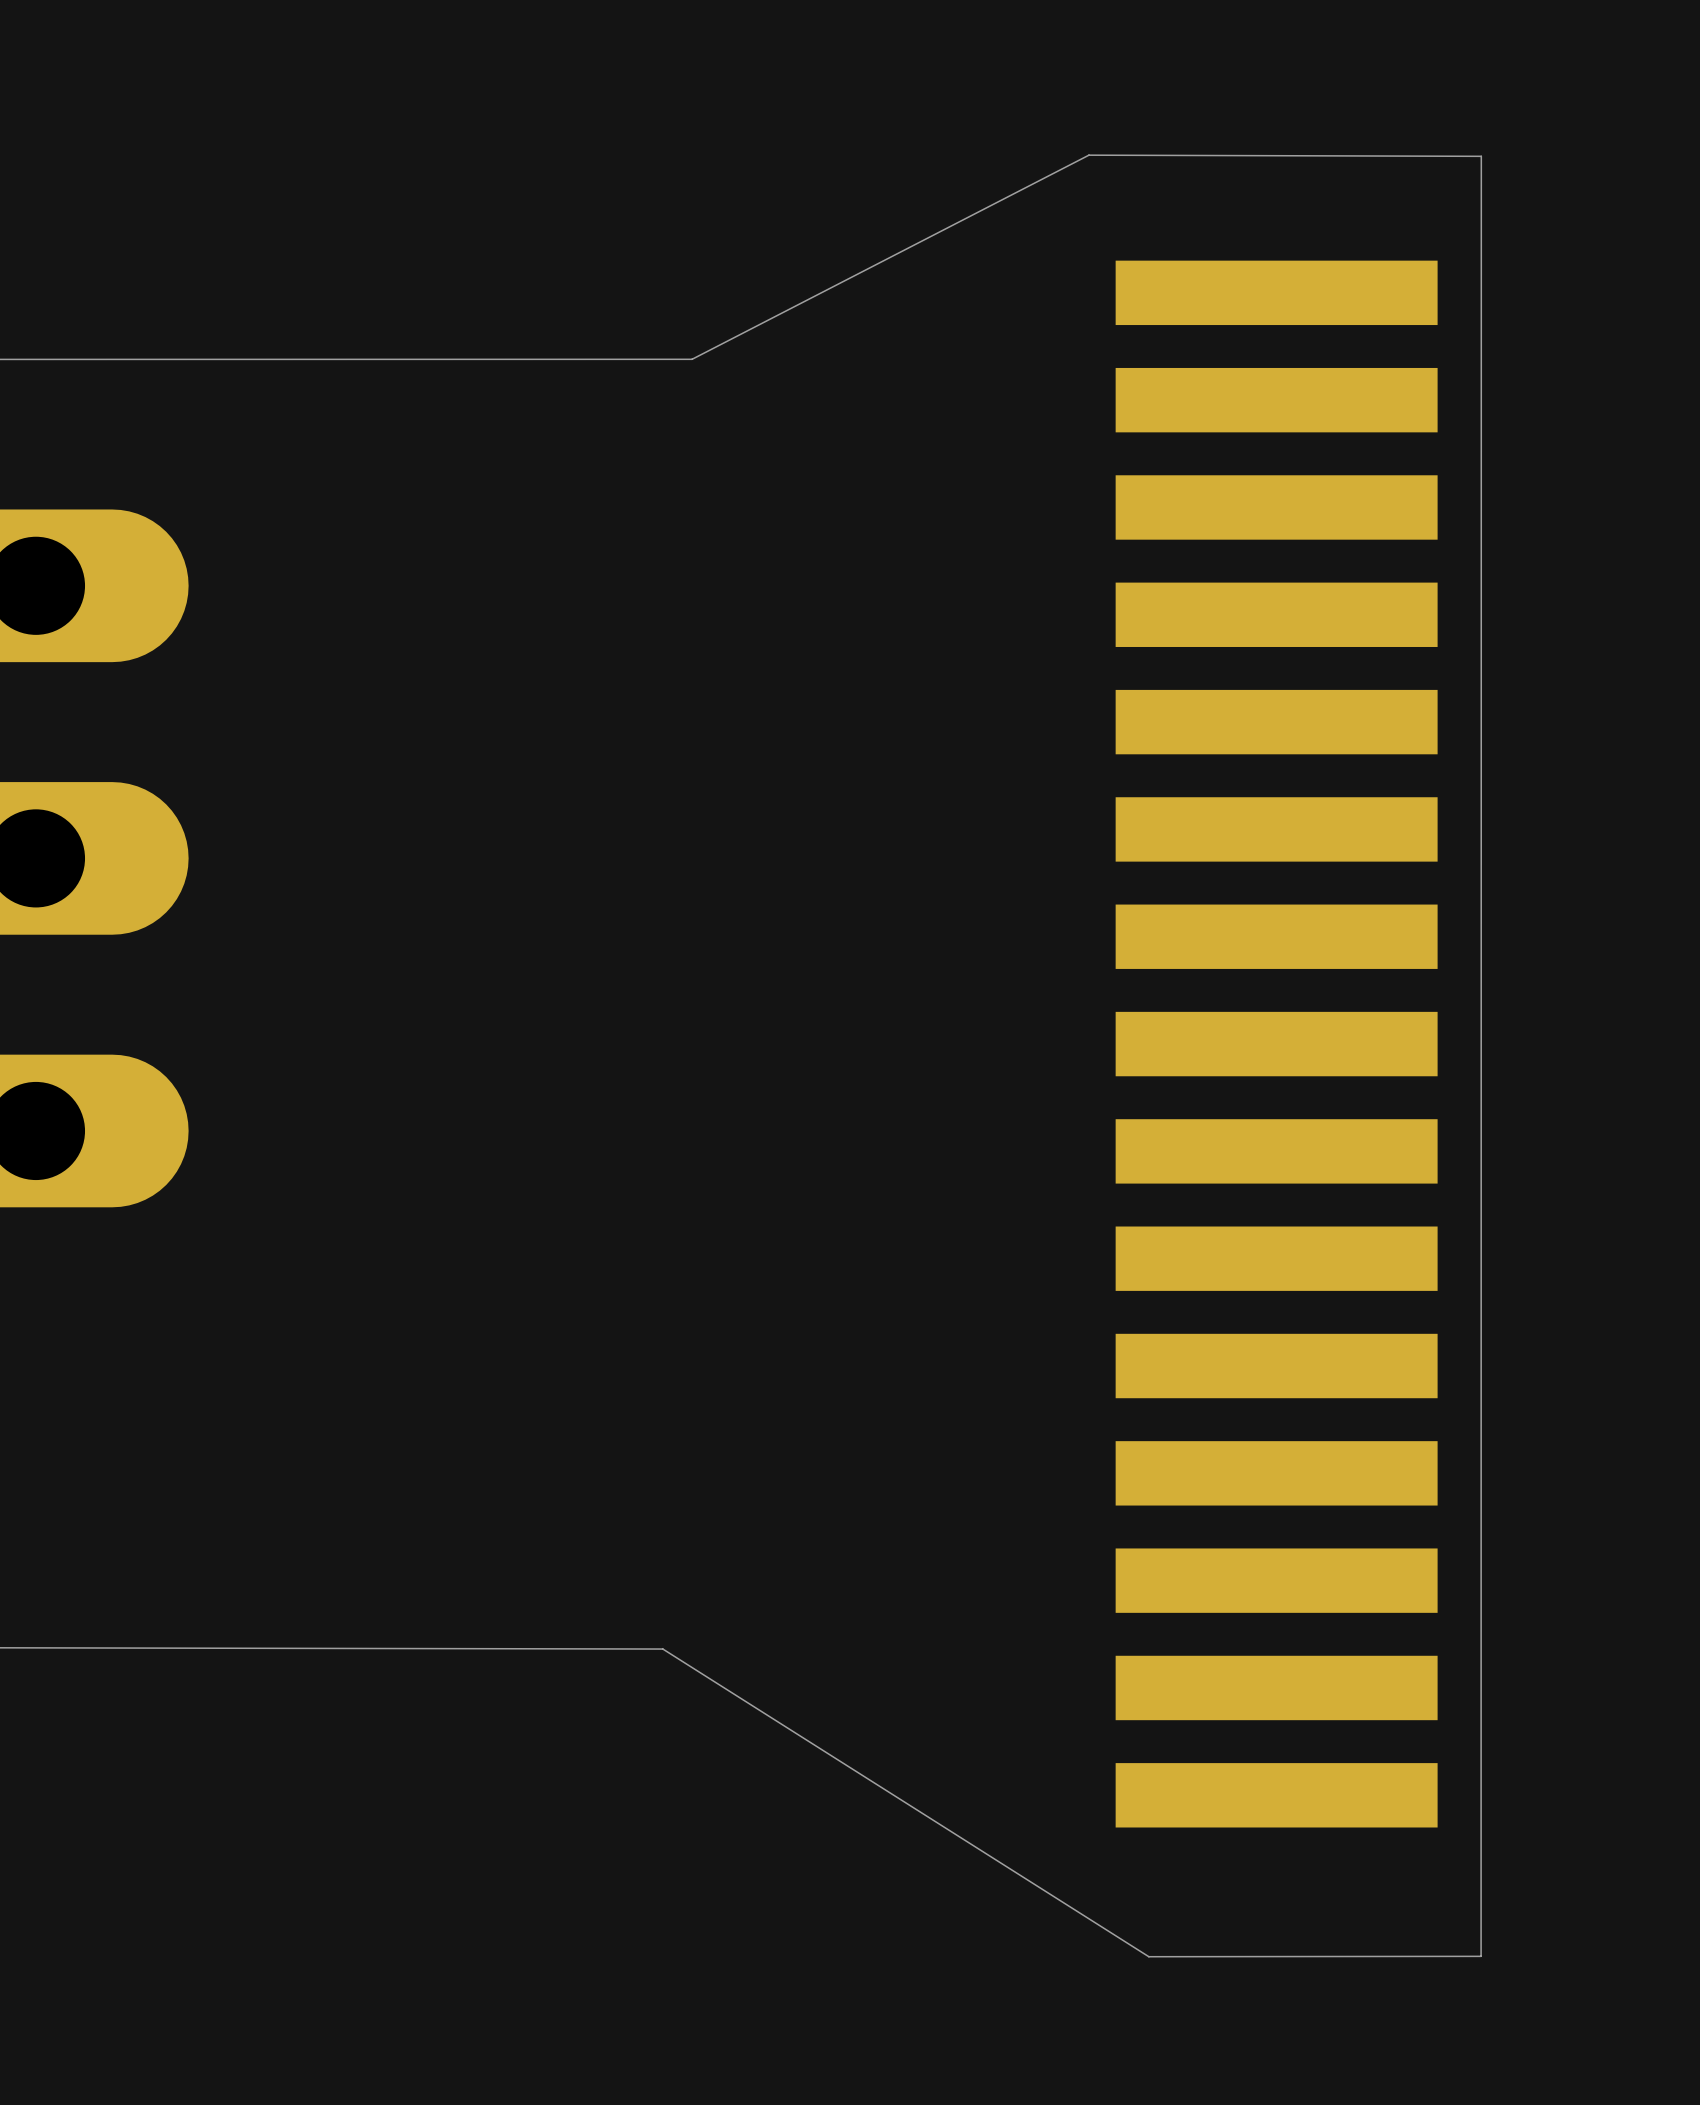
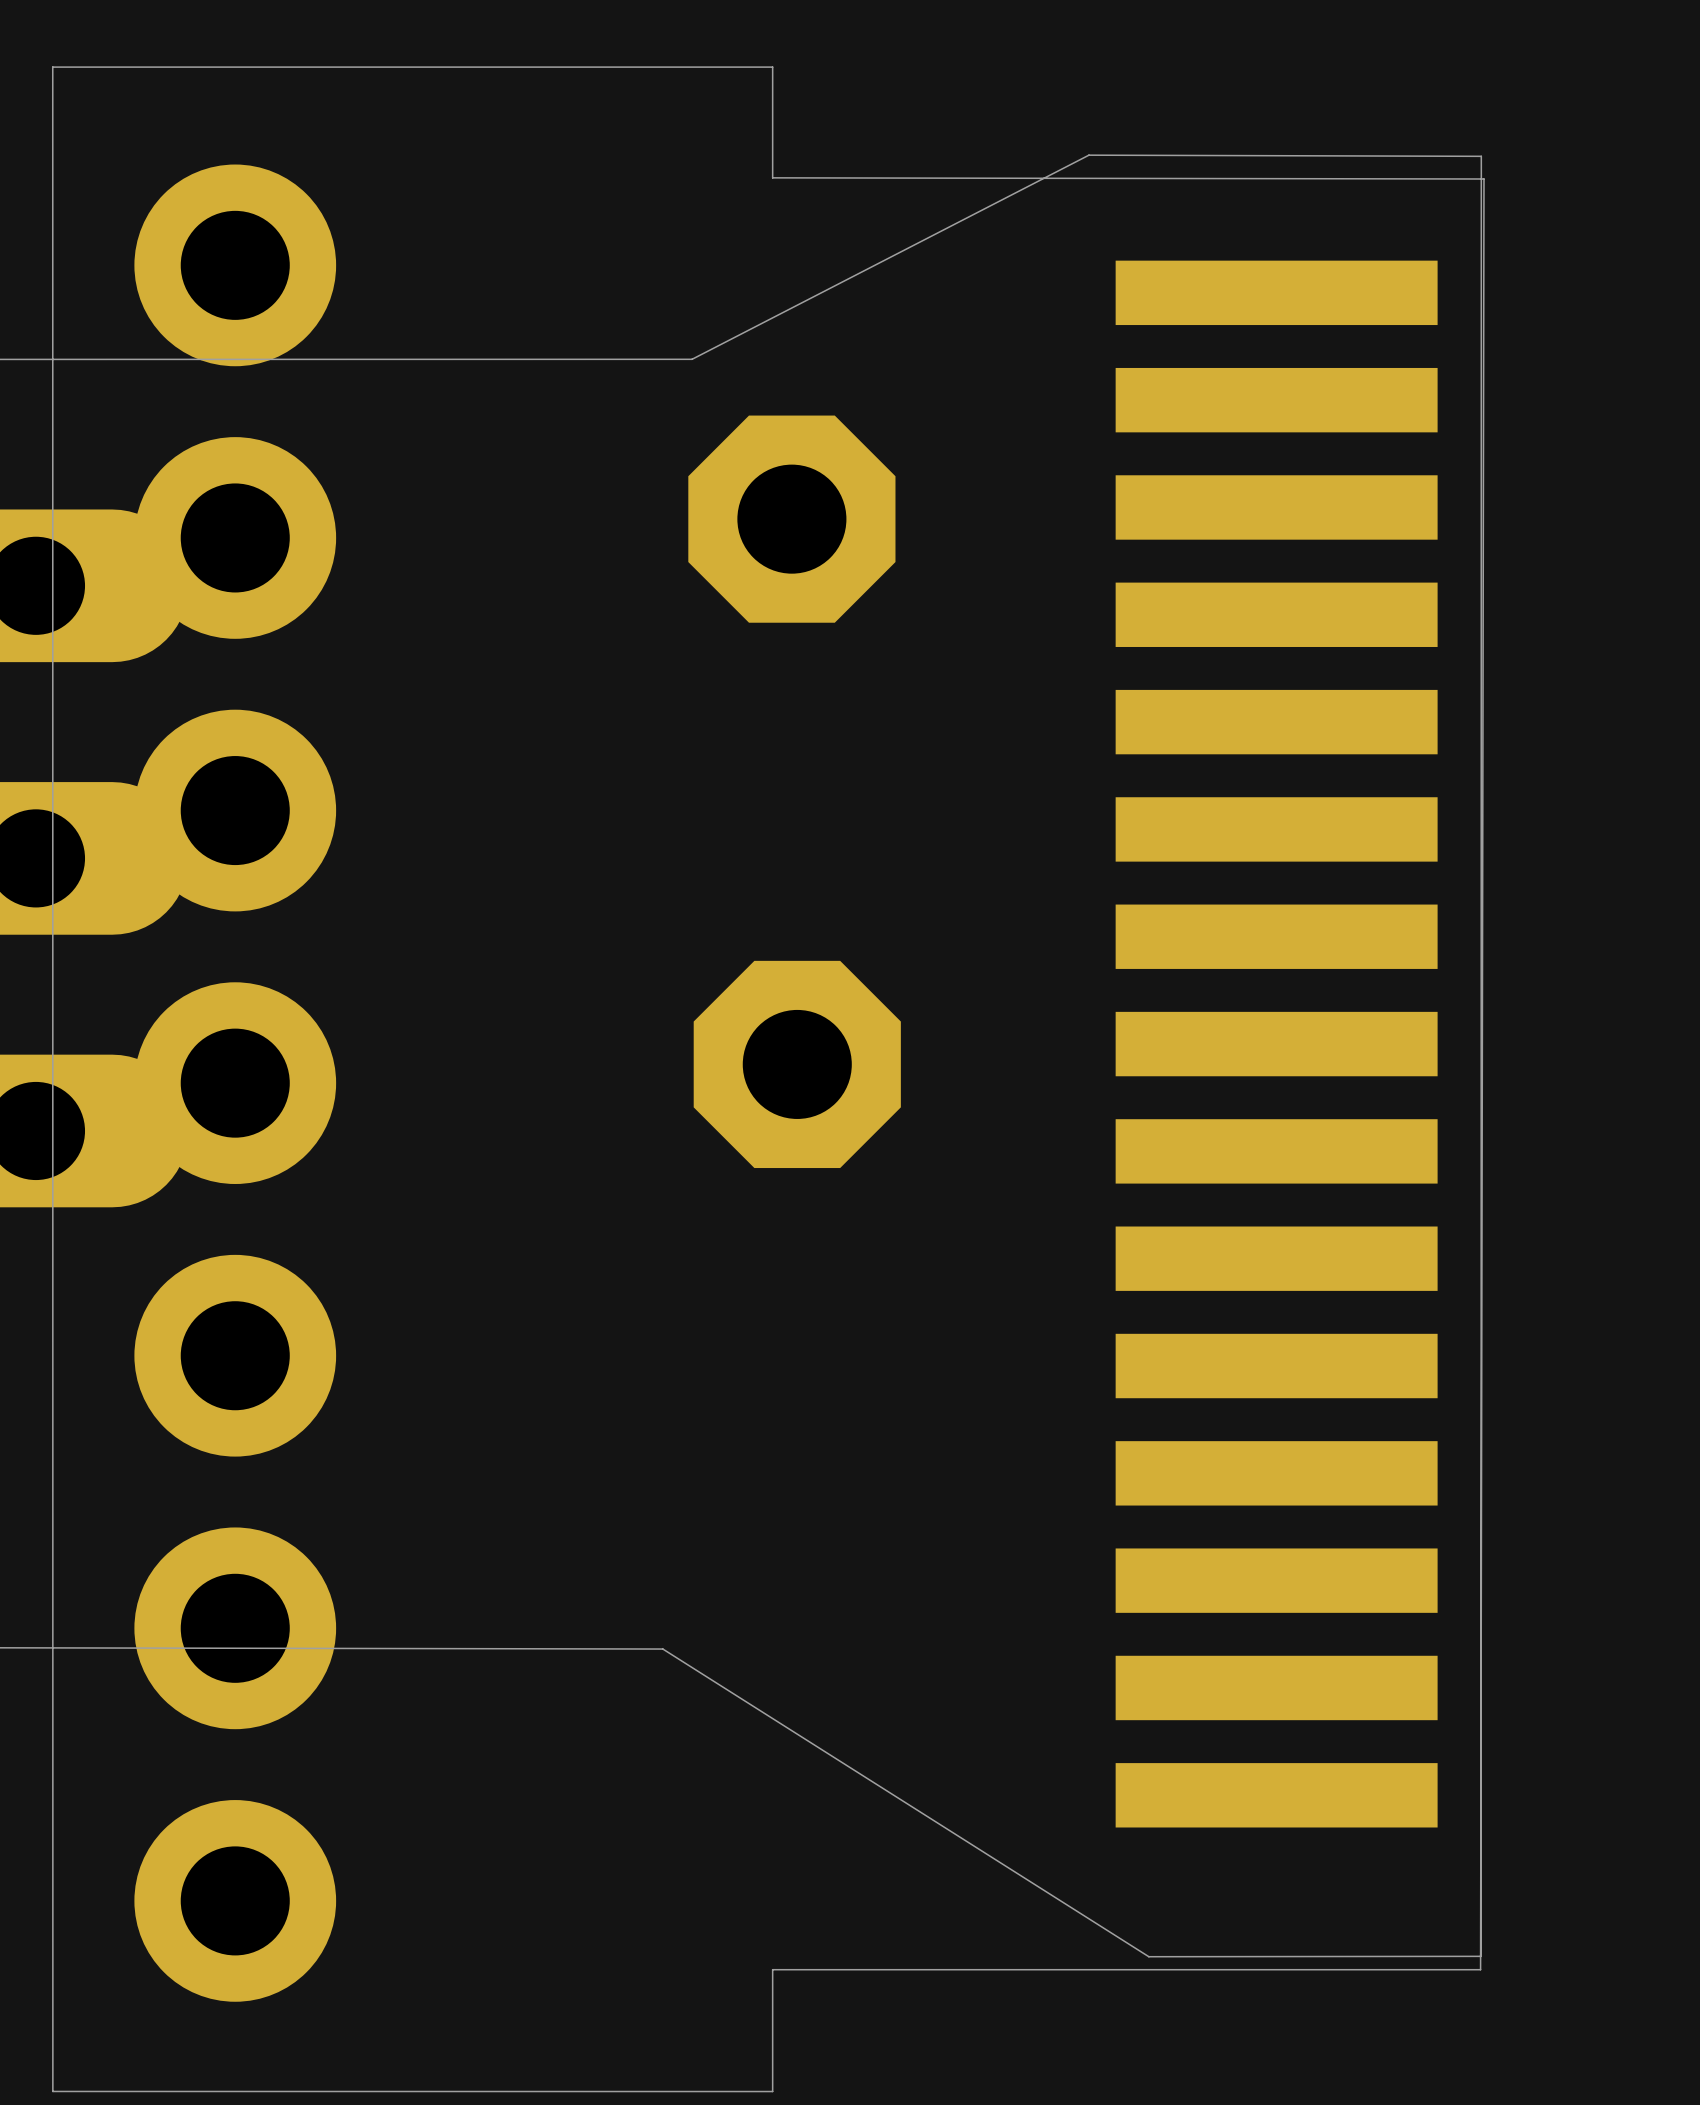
board edge: none -> (772, 67) (772, 177) (1483, 179) (1480, 1969) (772, 1969) (772, 2091) (52, 2091) (52, 67) (772, 67)
part: none -> (791, 519)
part: none -> (797, 1064)
part: none -> (235, 1083)

